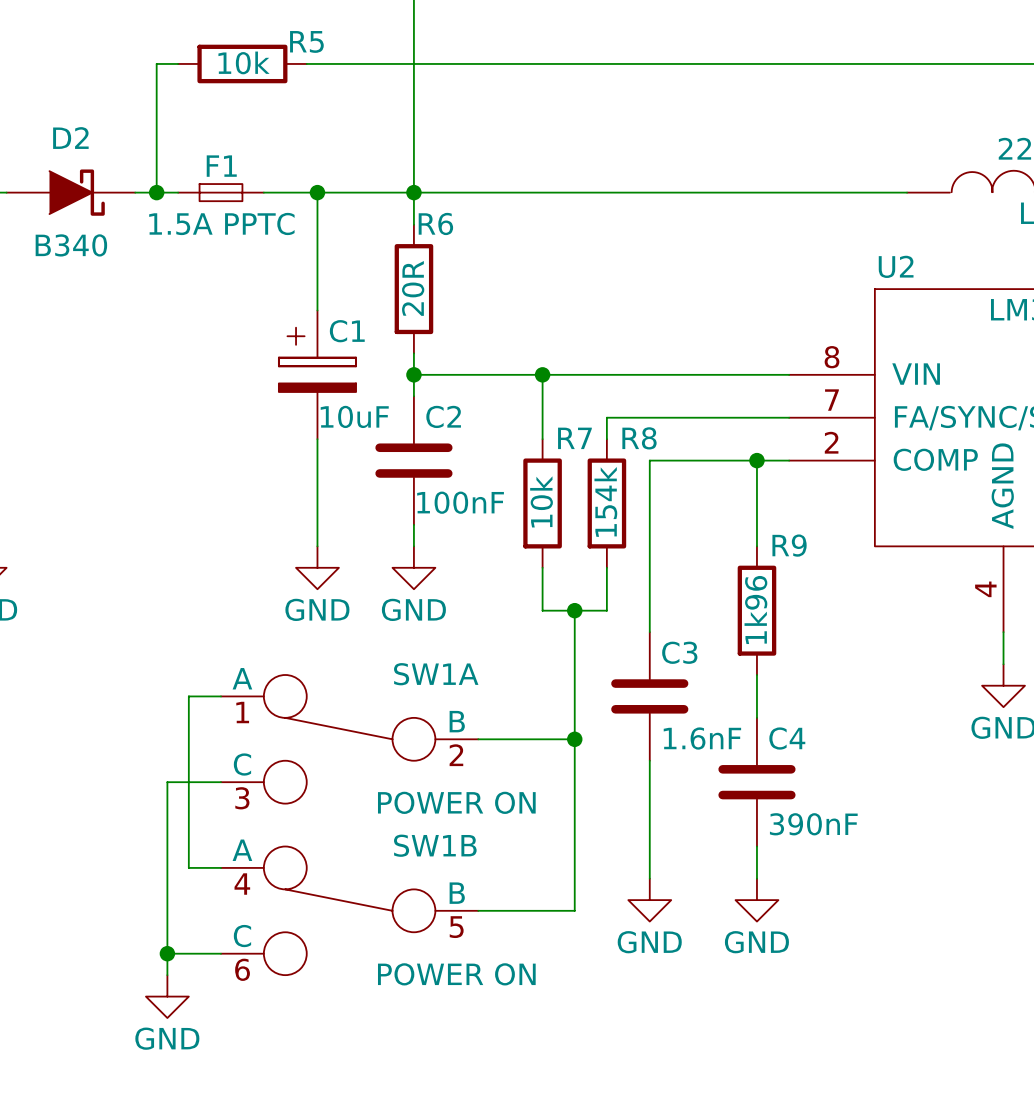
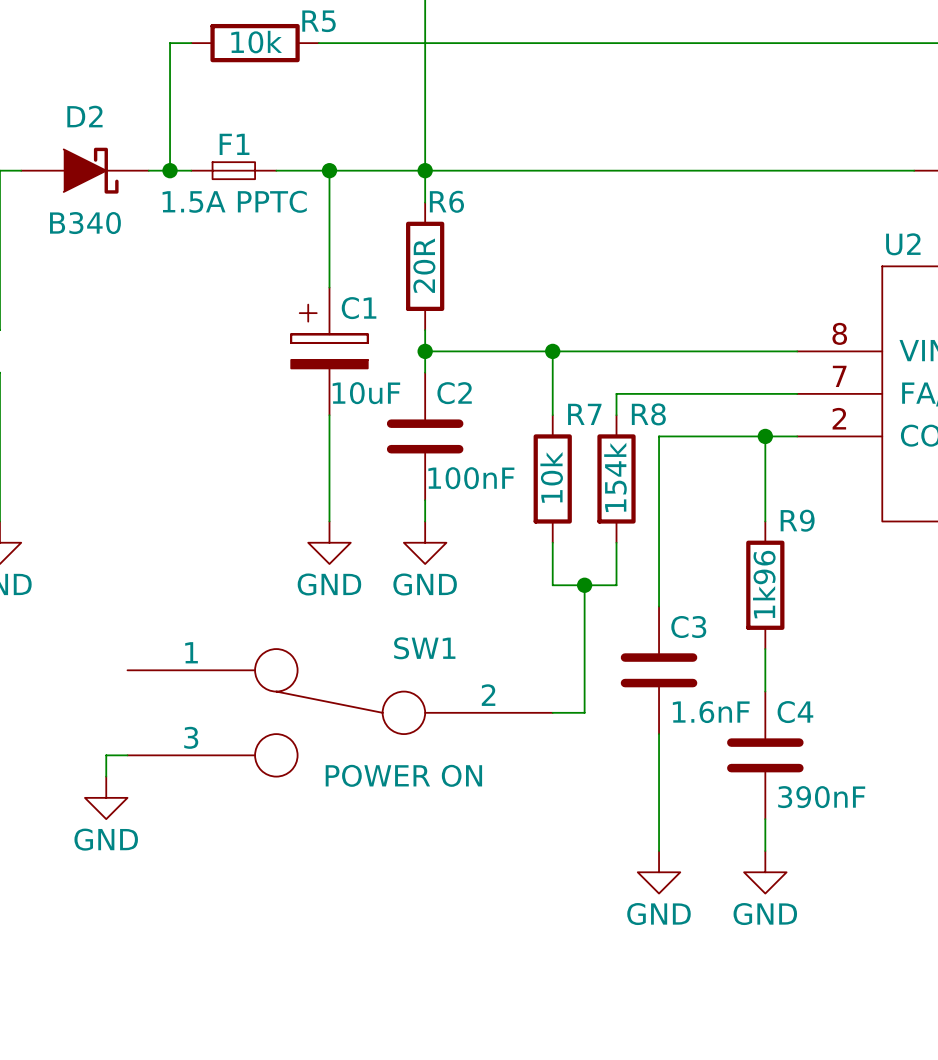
wire: (221, 696) (188, 696) (188, 867) (221, 867) -> none
SW1: none -> POWER ON (340, 712)
SW1A: POWER ON (349, 739) -> none
wire: (574, 739) (574, 910) (478, 910) -> none
junction: (574, 739) -> none
wire: none -> (127, 755) (106, 755) (106, 776)
wire: (221, 782) (167, 782) (167, 975) -> none
SW1B: POWER ON (349, 910) -> none
wire: (167, 953) (221, 953) -> none
junction: (167, 953) -> none
power symbol position: GND (167, 996) -> GND (106, 797)

